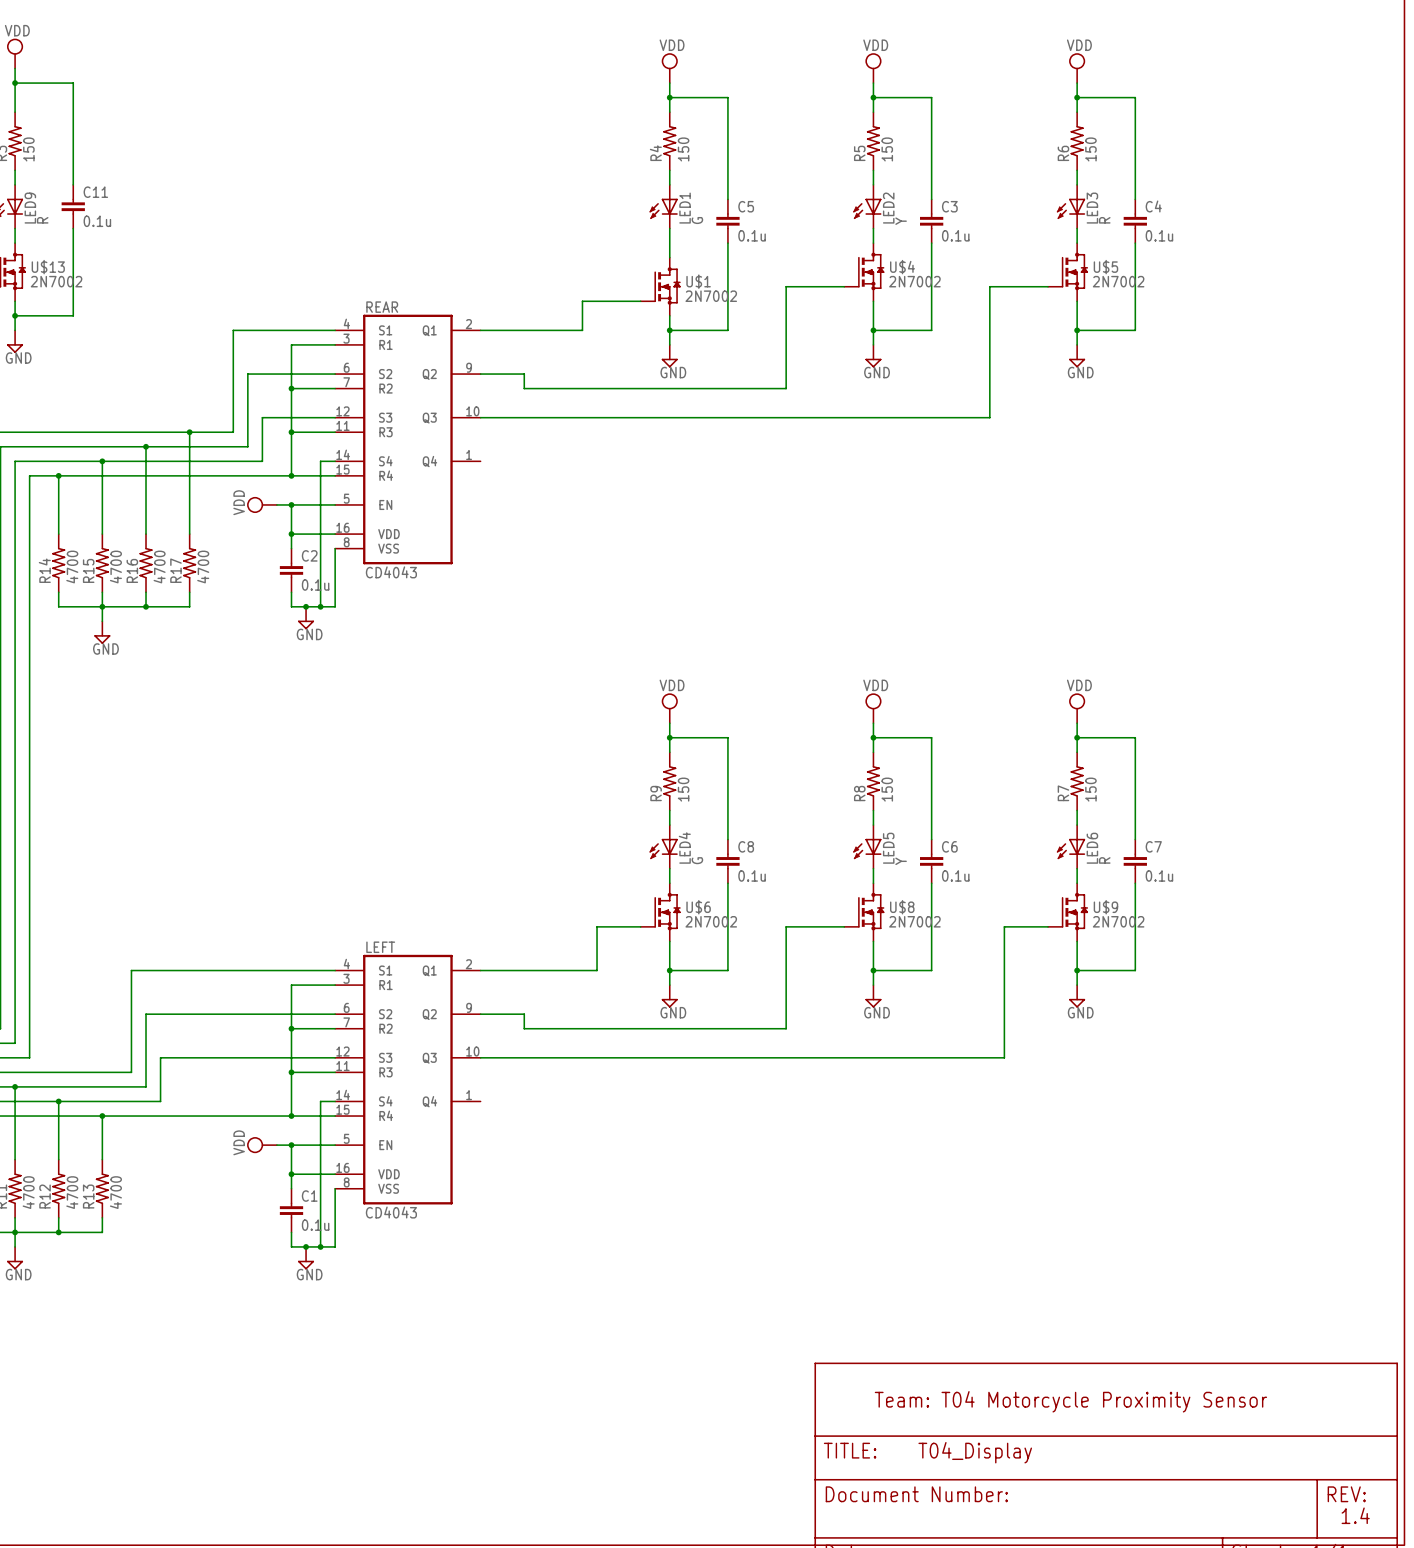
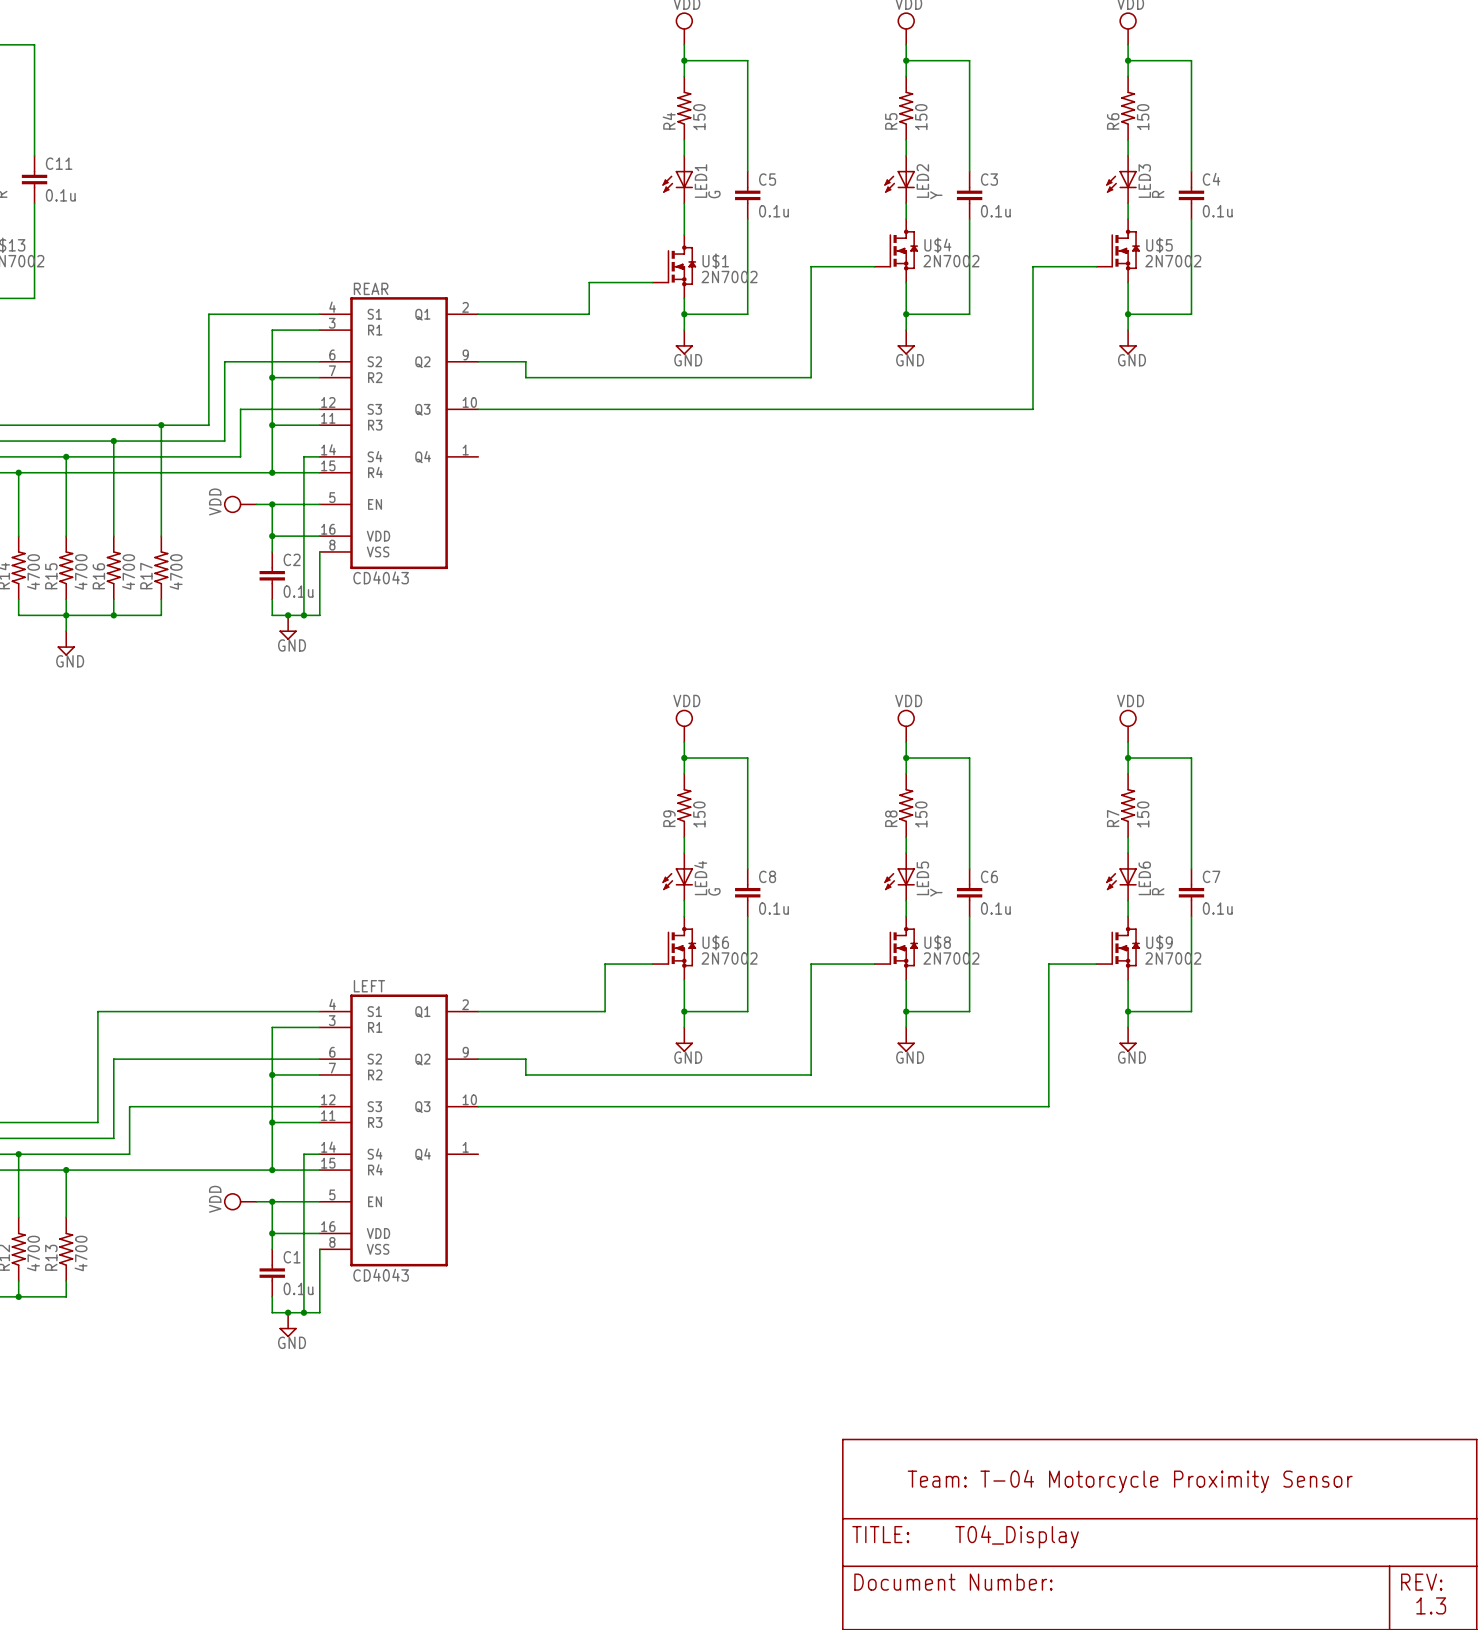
text: Team: T04 Motorcycle Proximity Sensor (1070, 1401) -> Team: T-04 Motorcycle Proximity Sensor (1130, 1481)
text: 1.4 (1355, 1515) -> 1.3 (1431, 1605)

